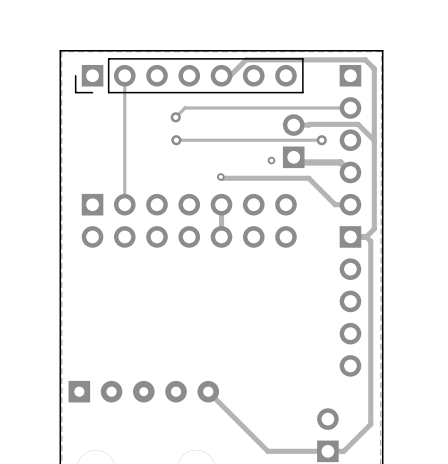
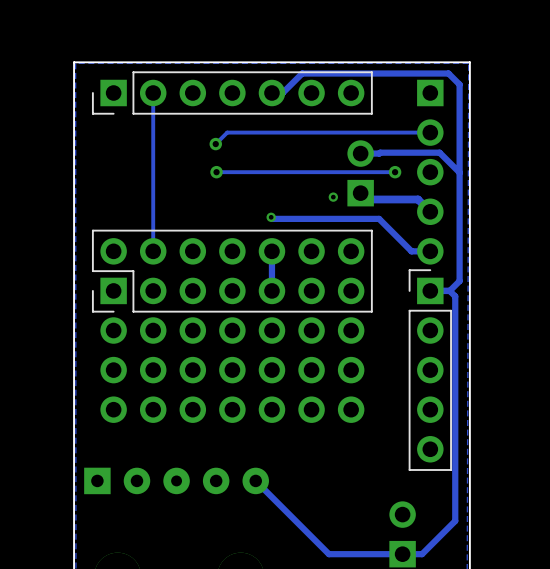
part side: top (189, 220) -> bottom (232, 271)
part: none -> (232, 370)
part side: top (350, 301) -> bottom (430, 370)

